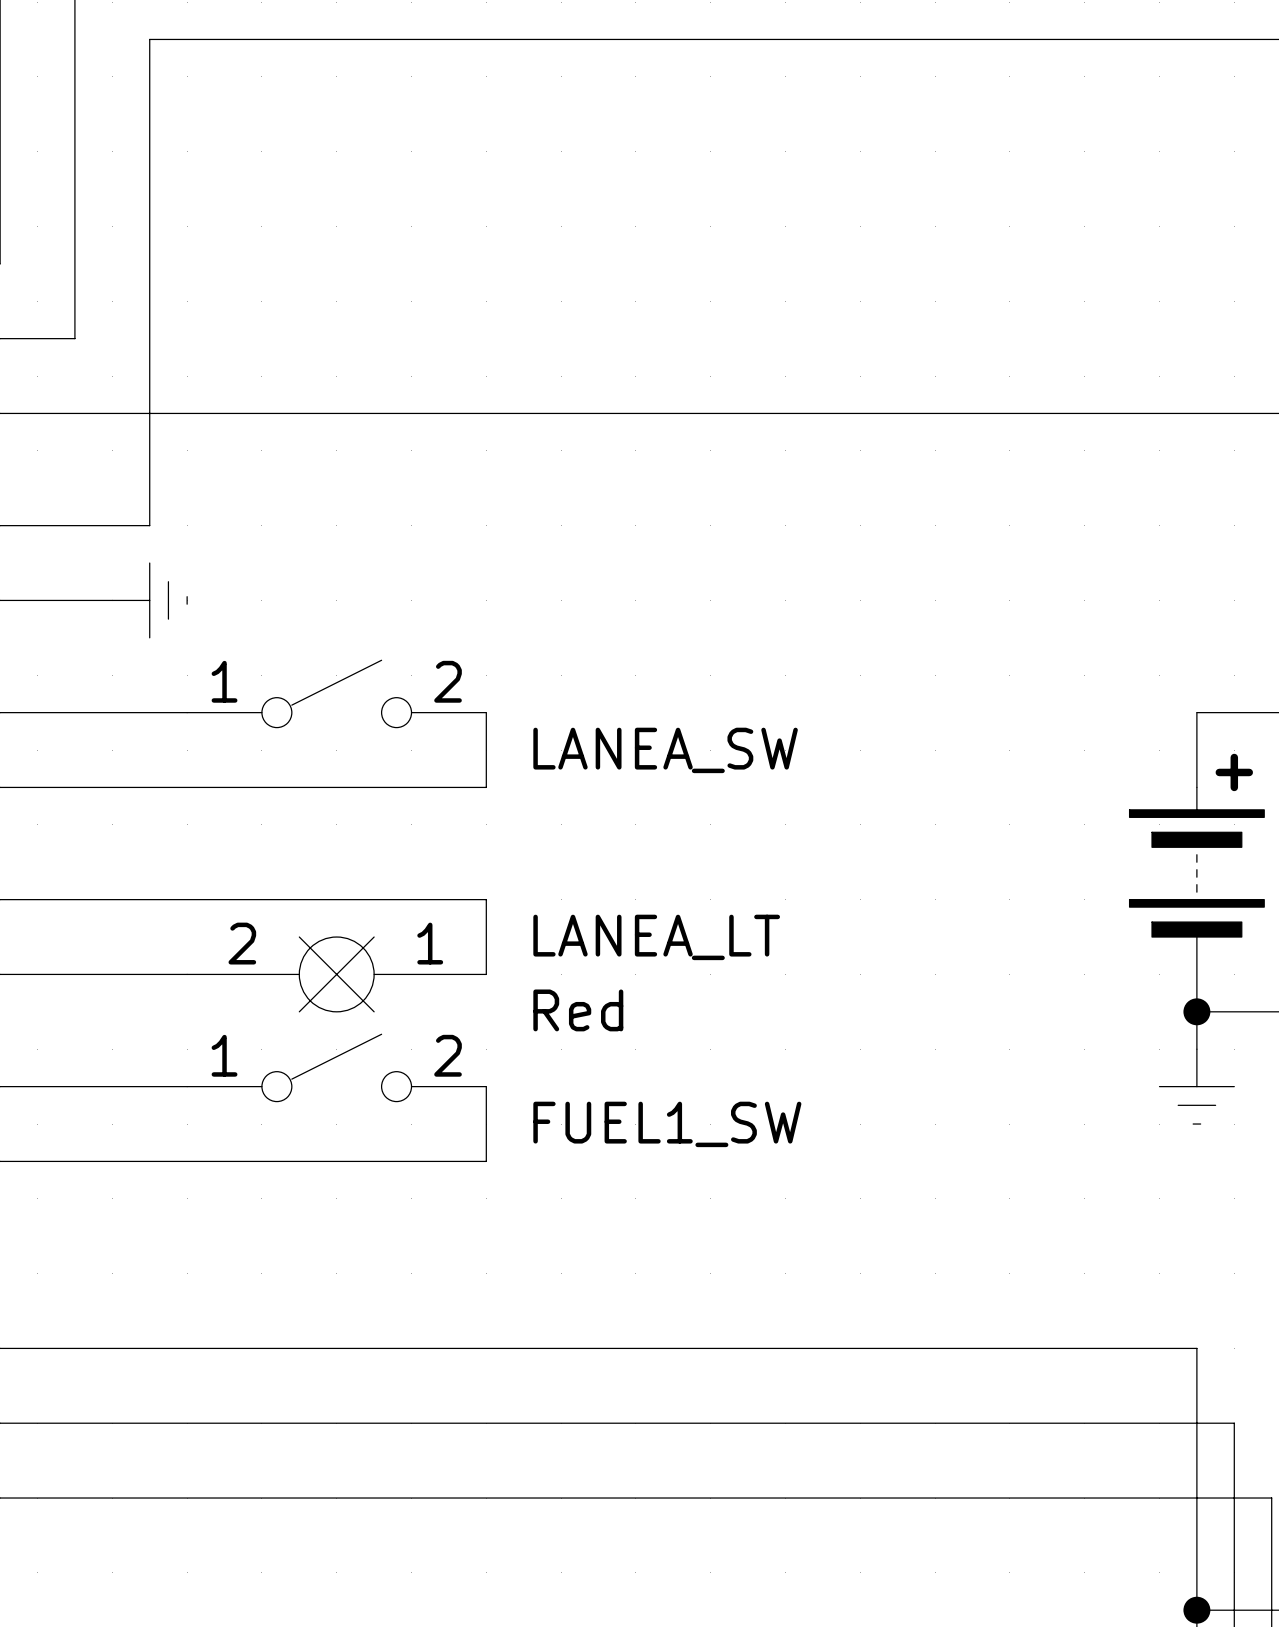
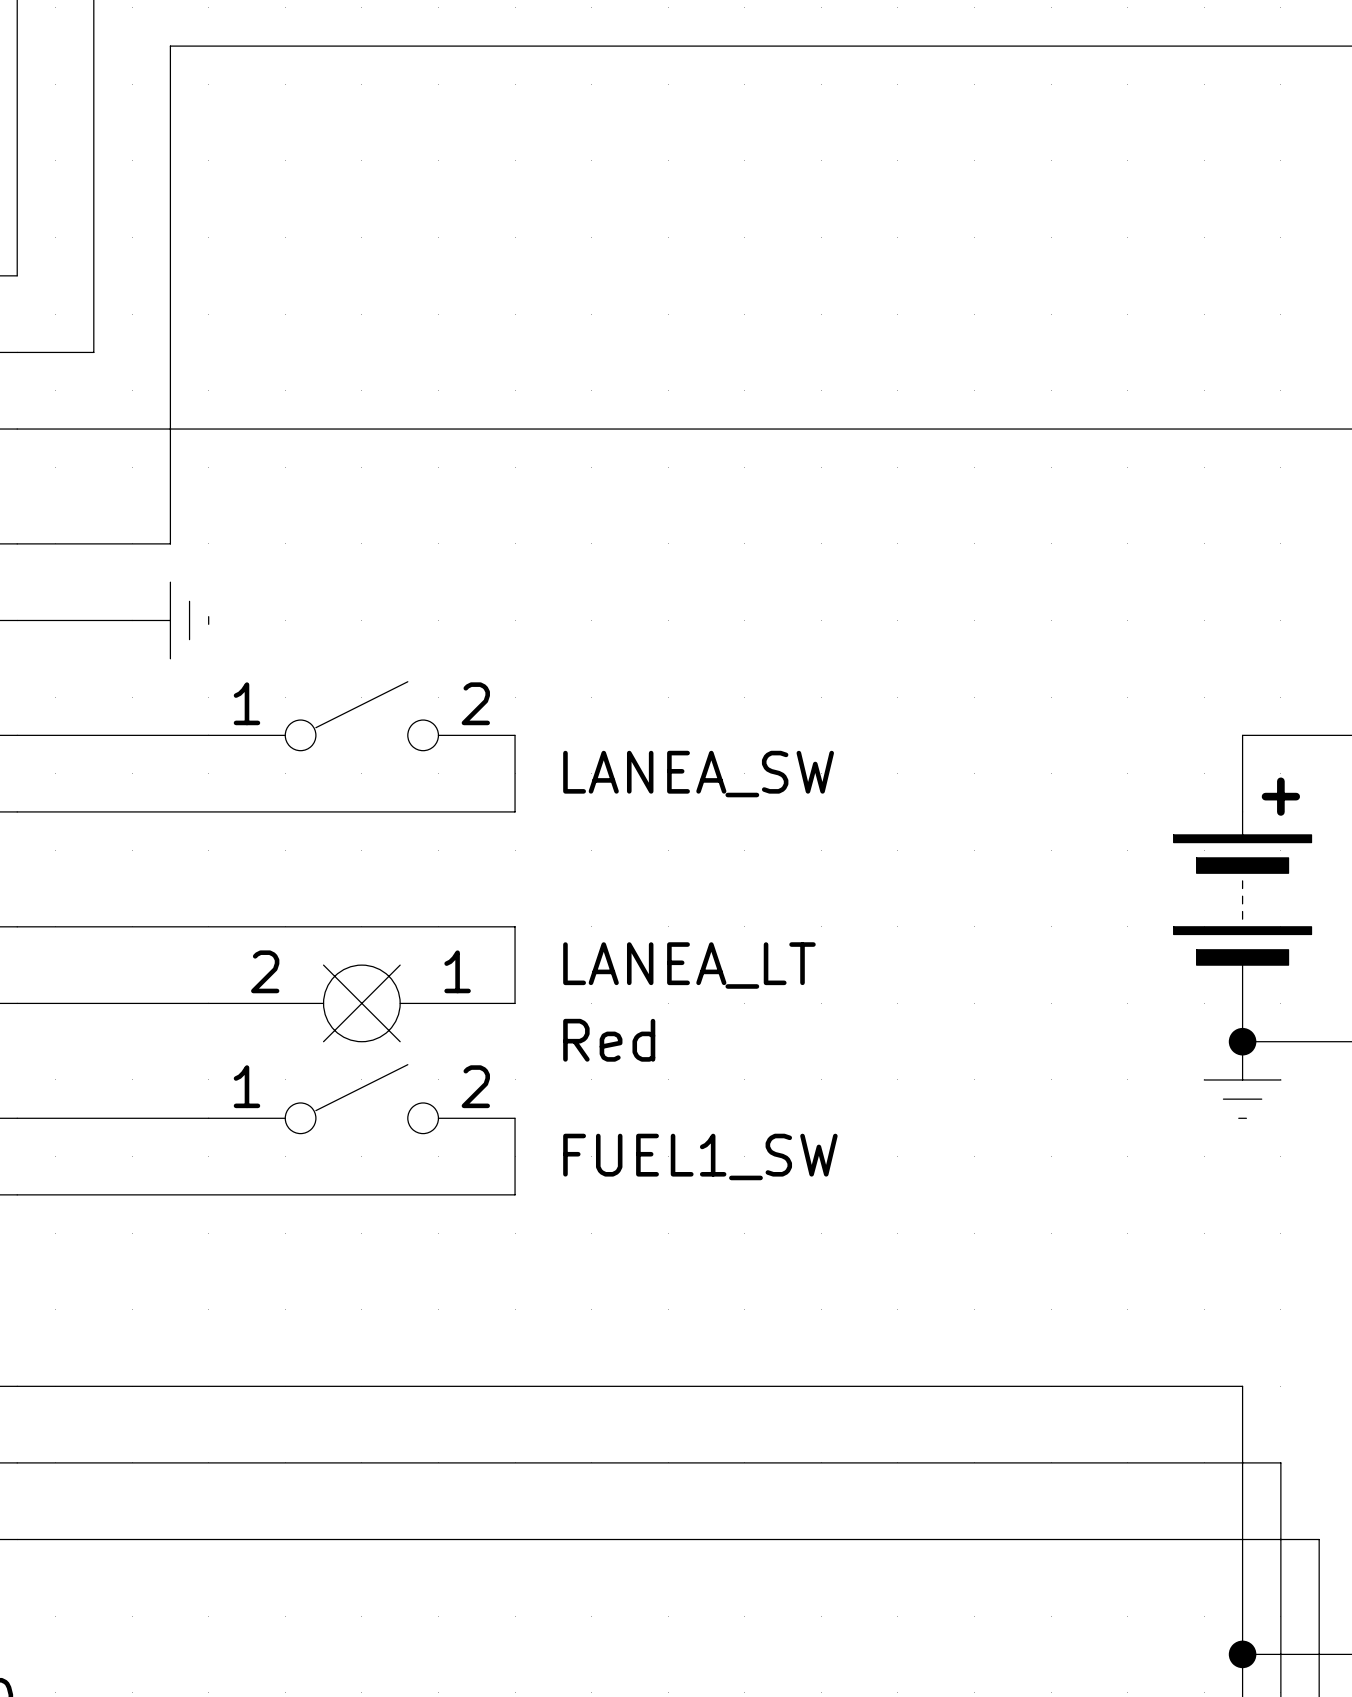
power symbol position: (1196, 1086) -> (1242, 1079)

